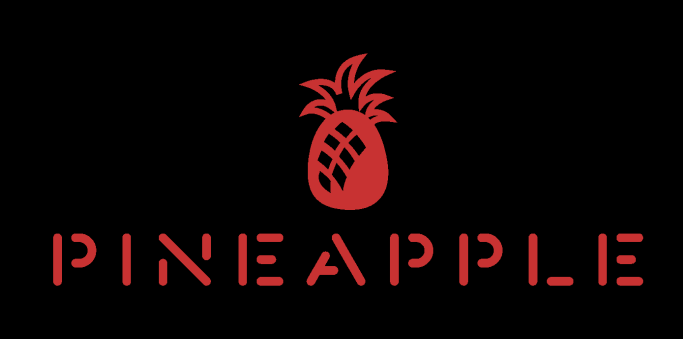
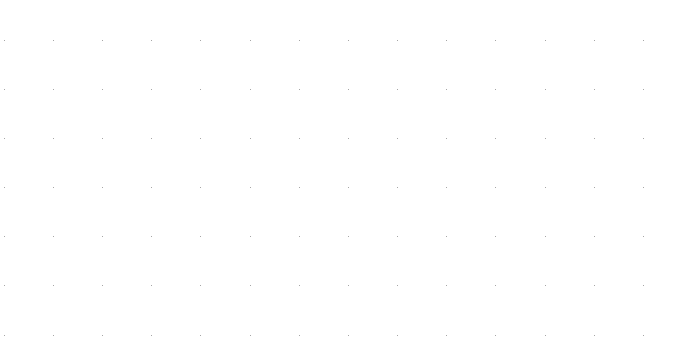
part: (348, 169) -> none

